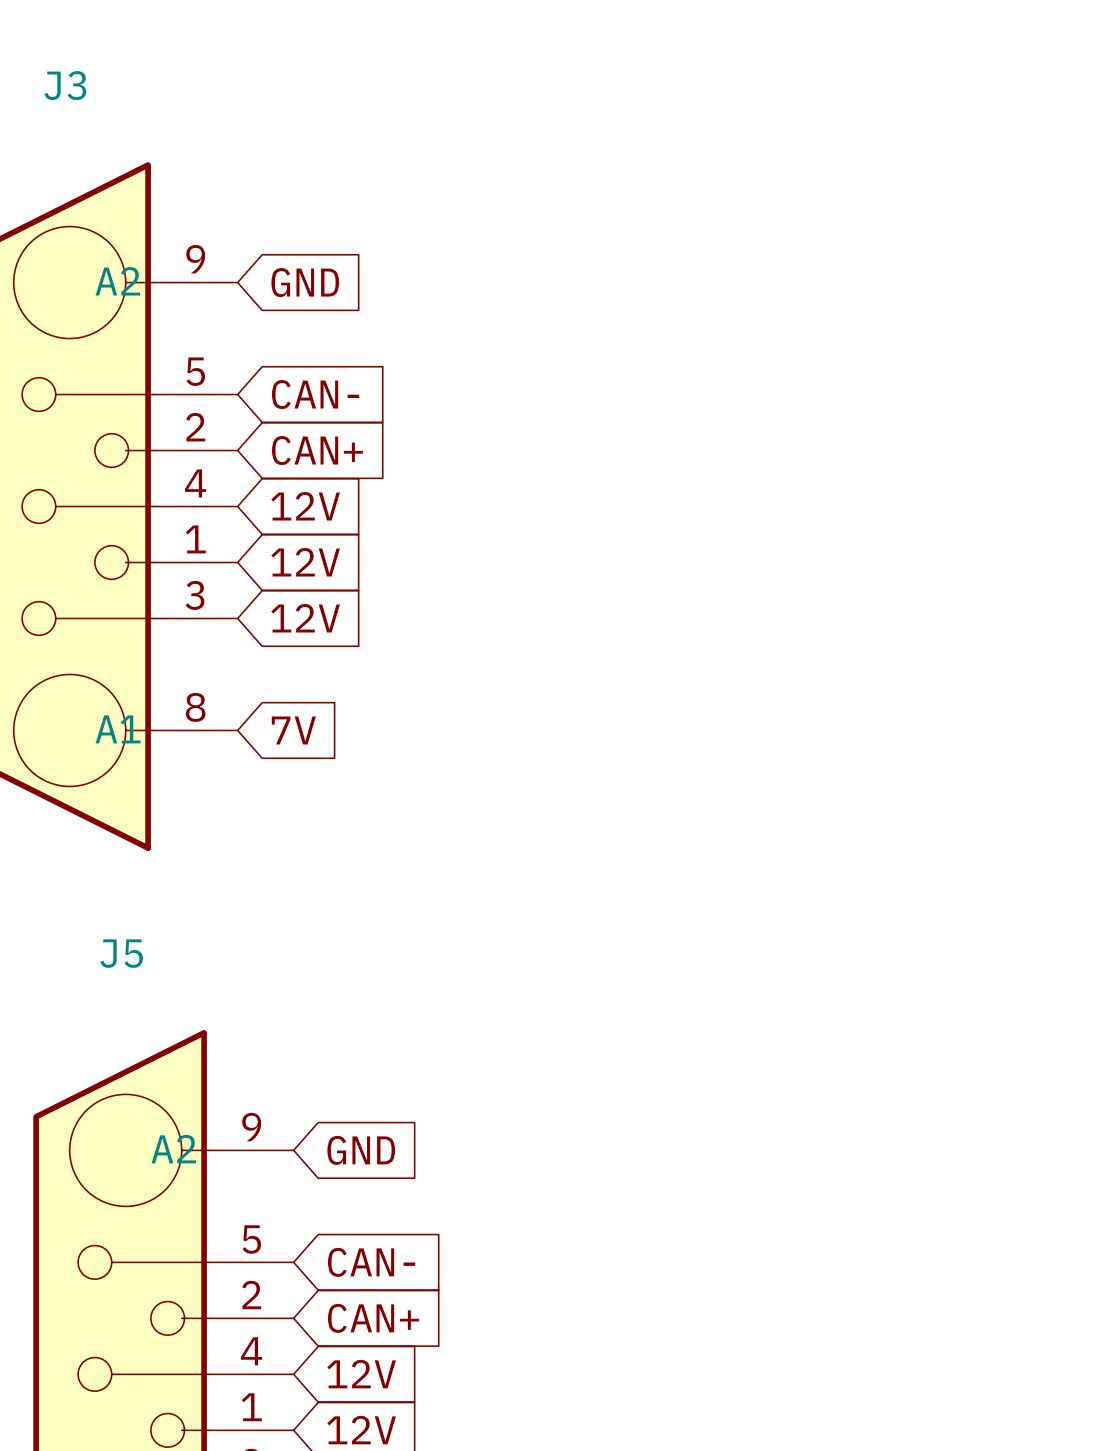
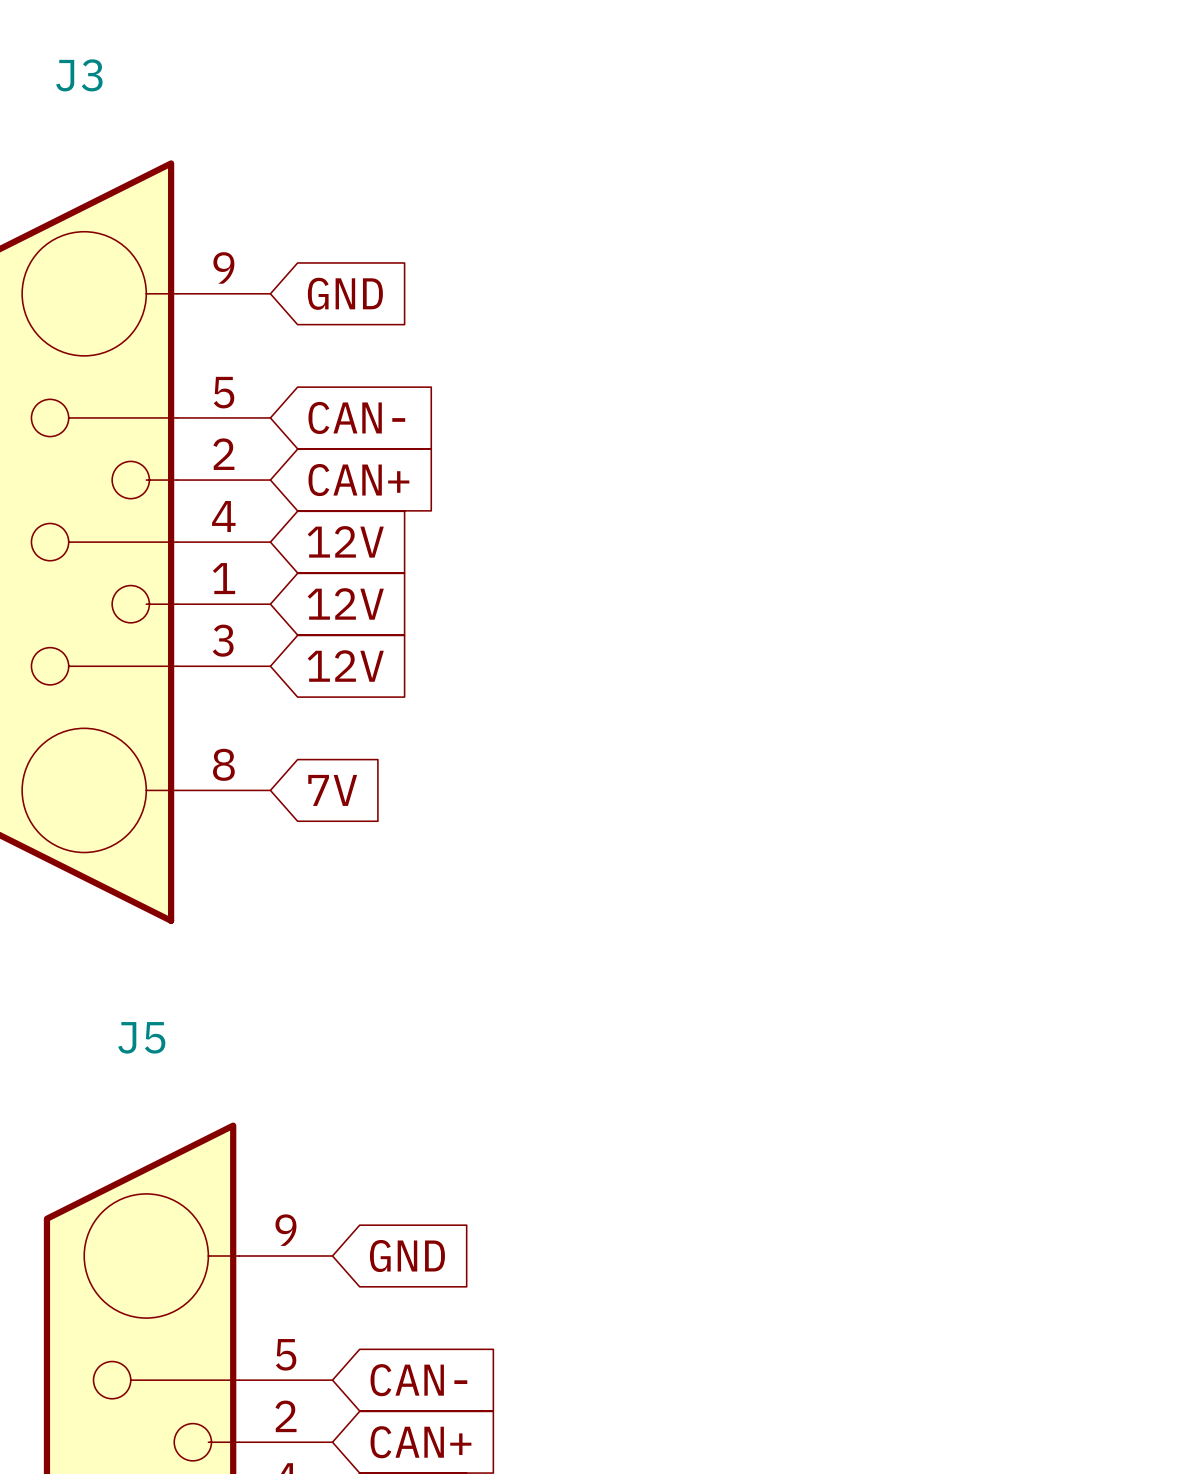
J3 pin name: A2 (117, 281) -> none
J3 pin name: A1 (118, 729) -> none
J5 pin name: A2 (173, 1149) -> none

